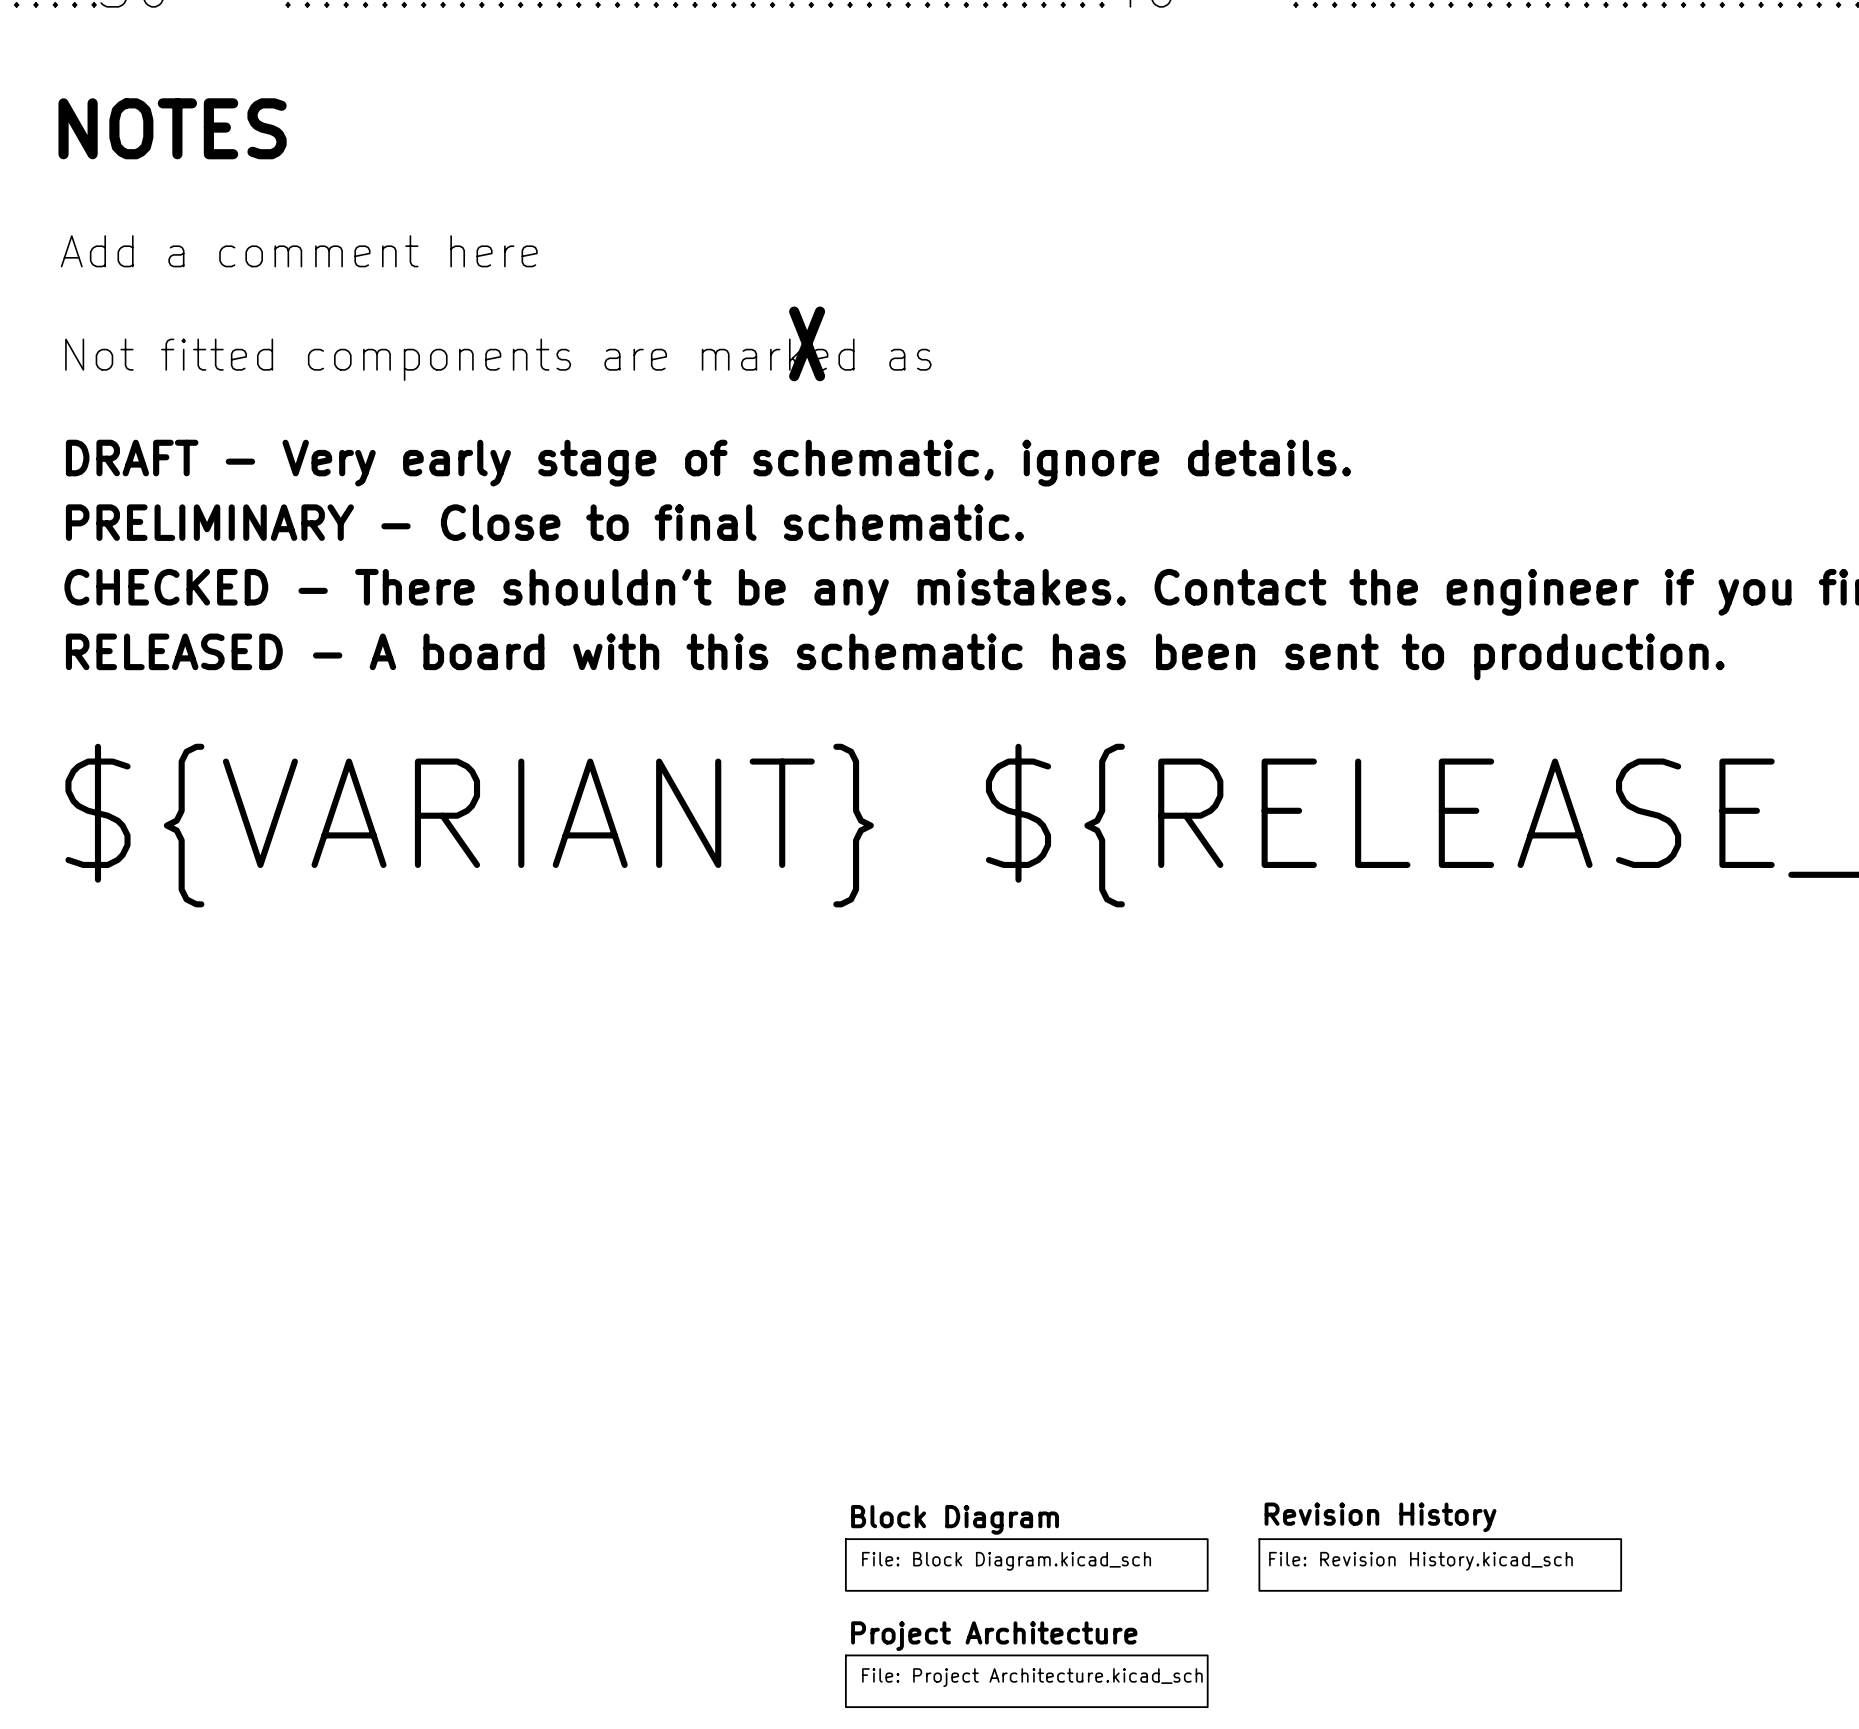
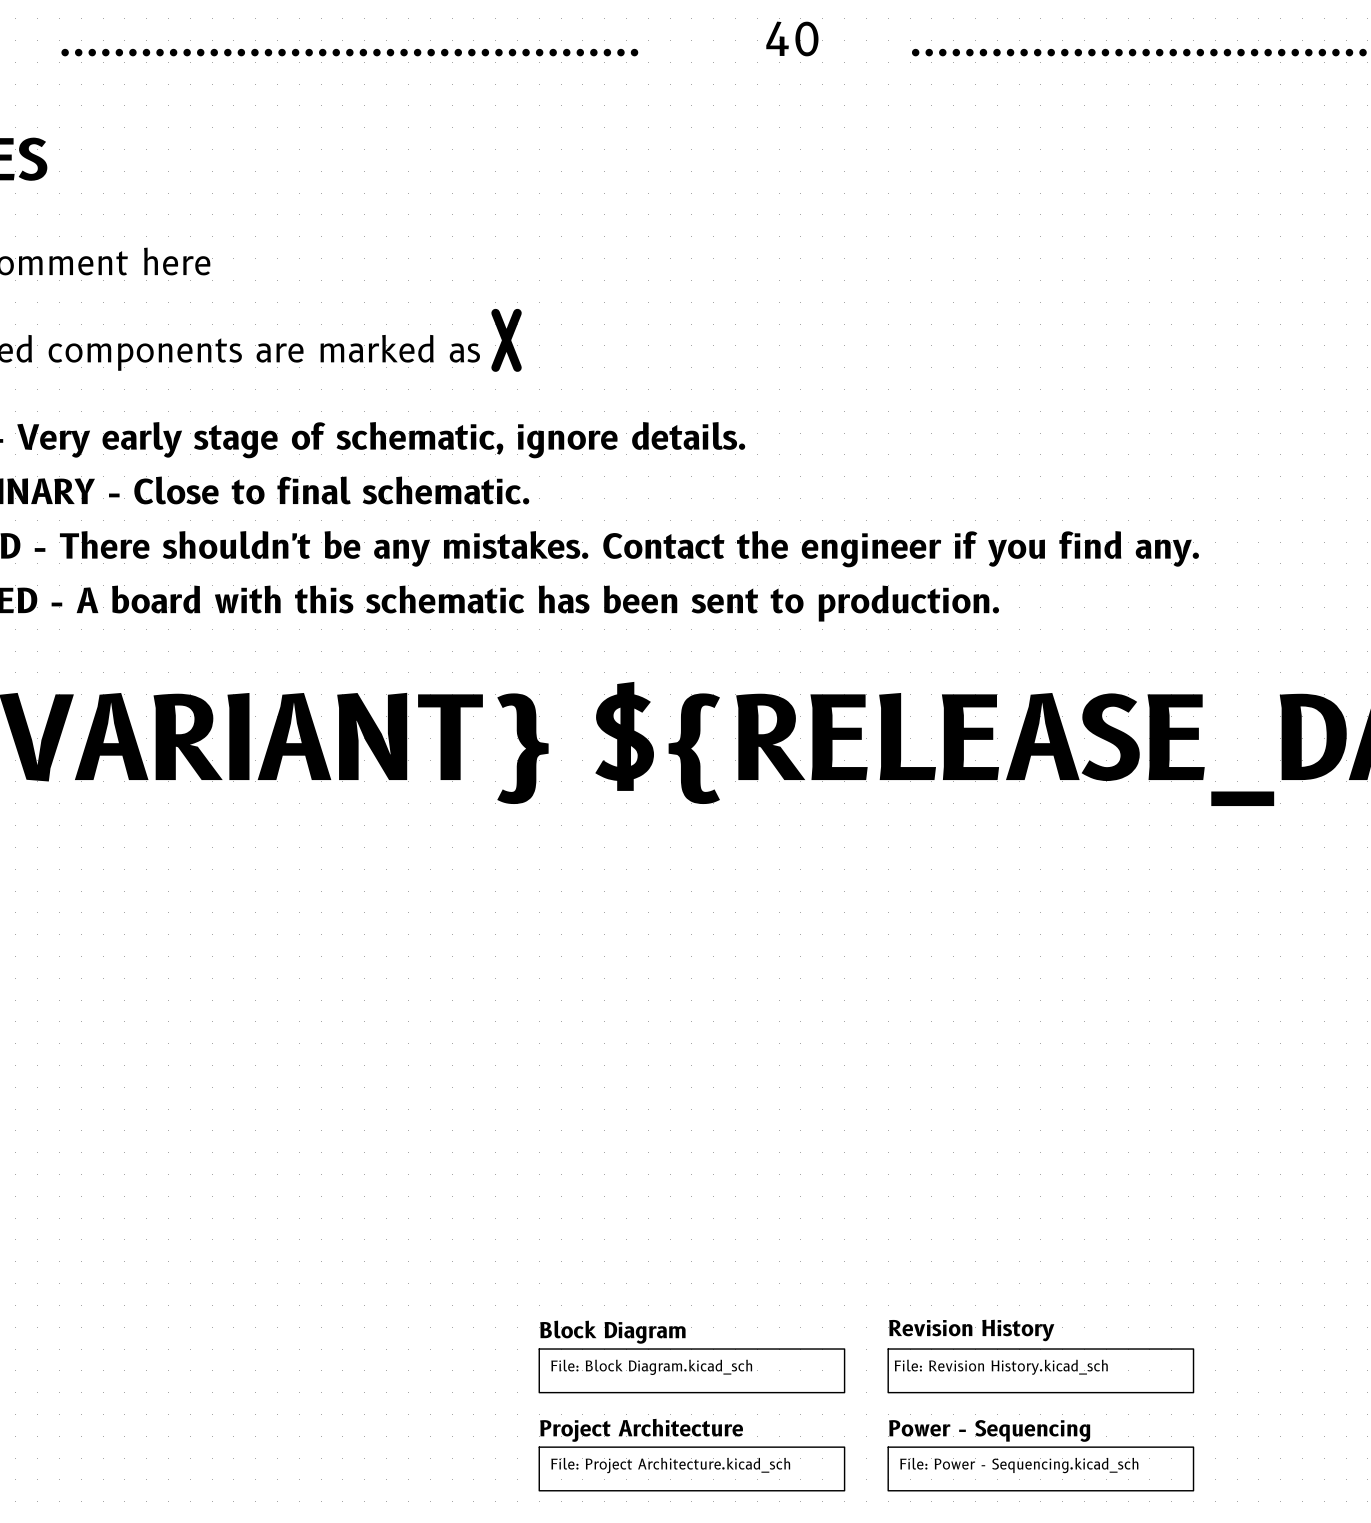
sheet Power - Sequencing: none -> File: Power - Sequencing.kicad_sch (1040, 1468)

